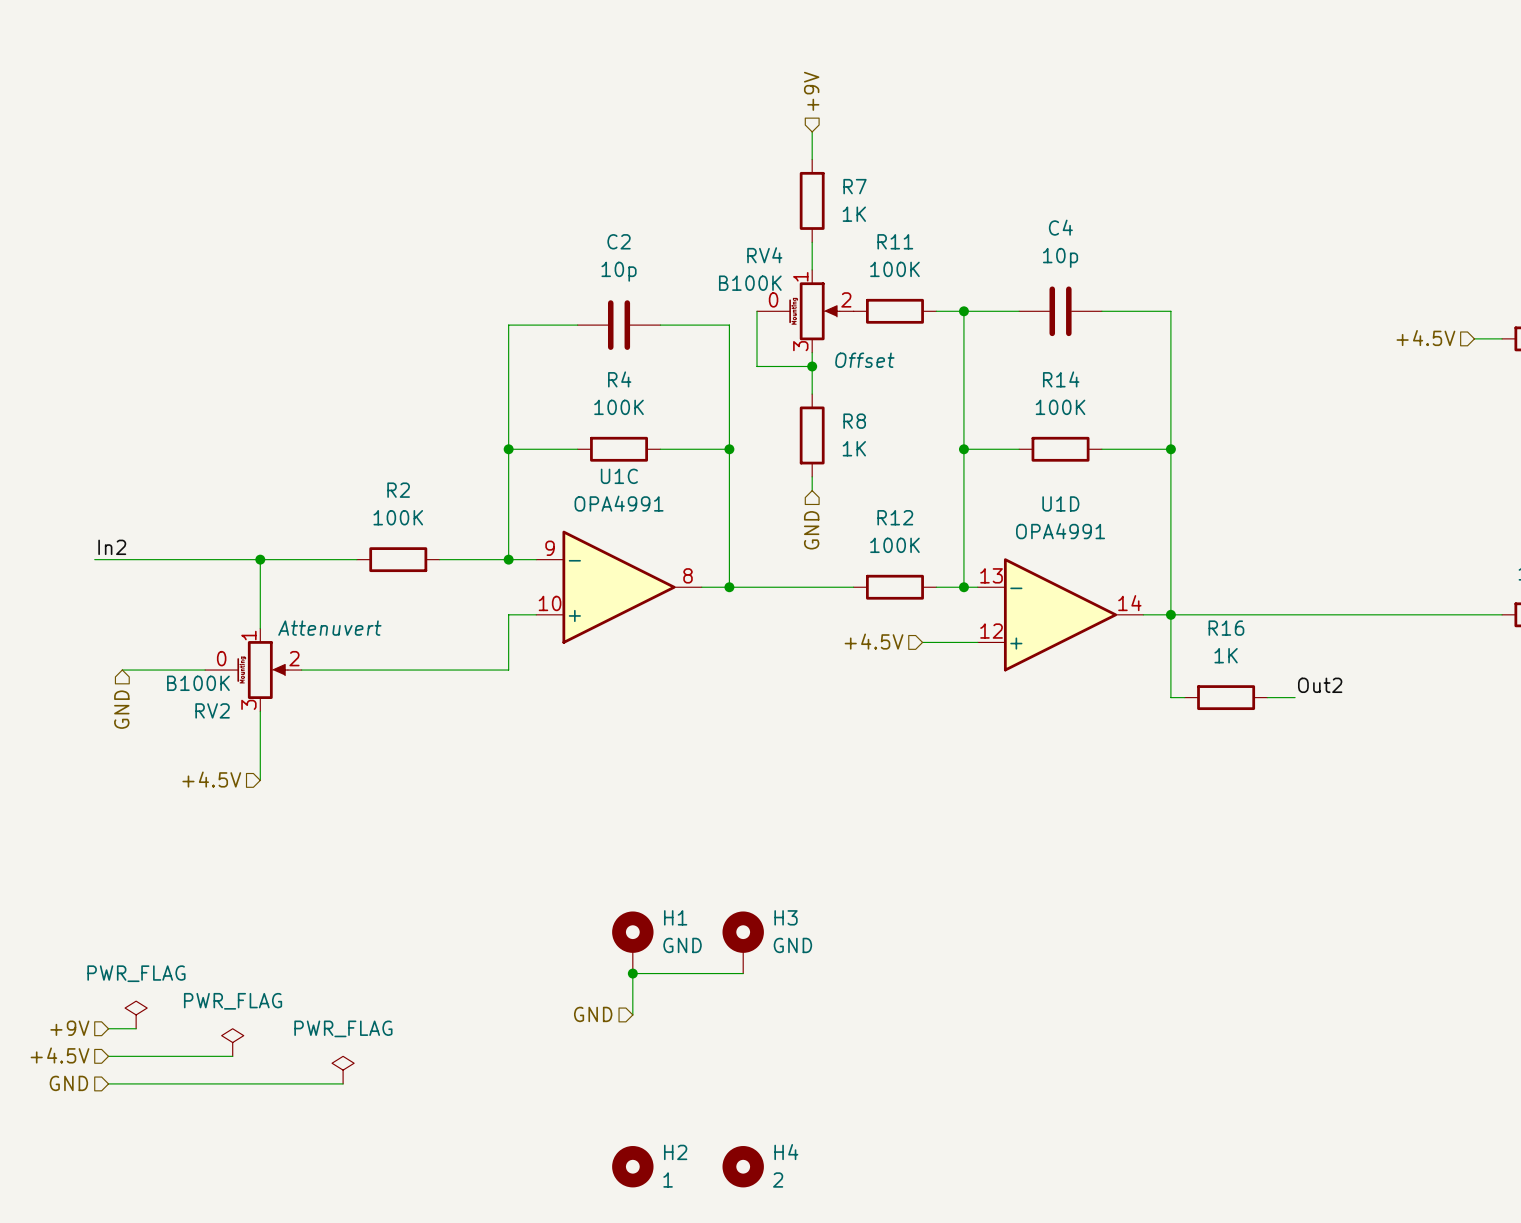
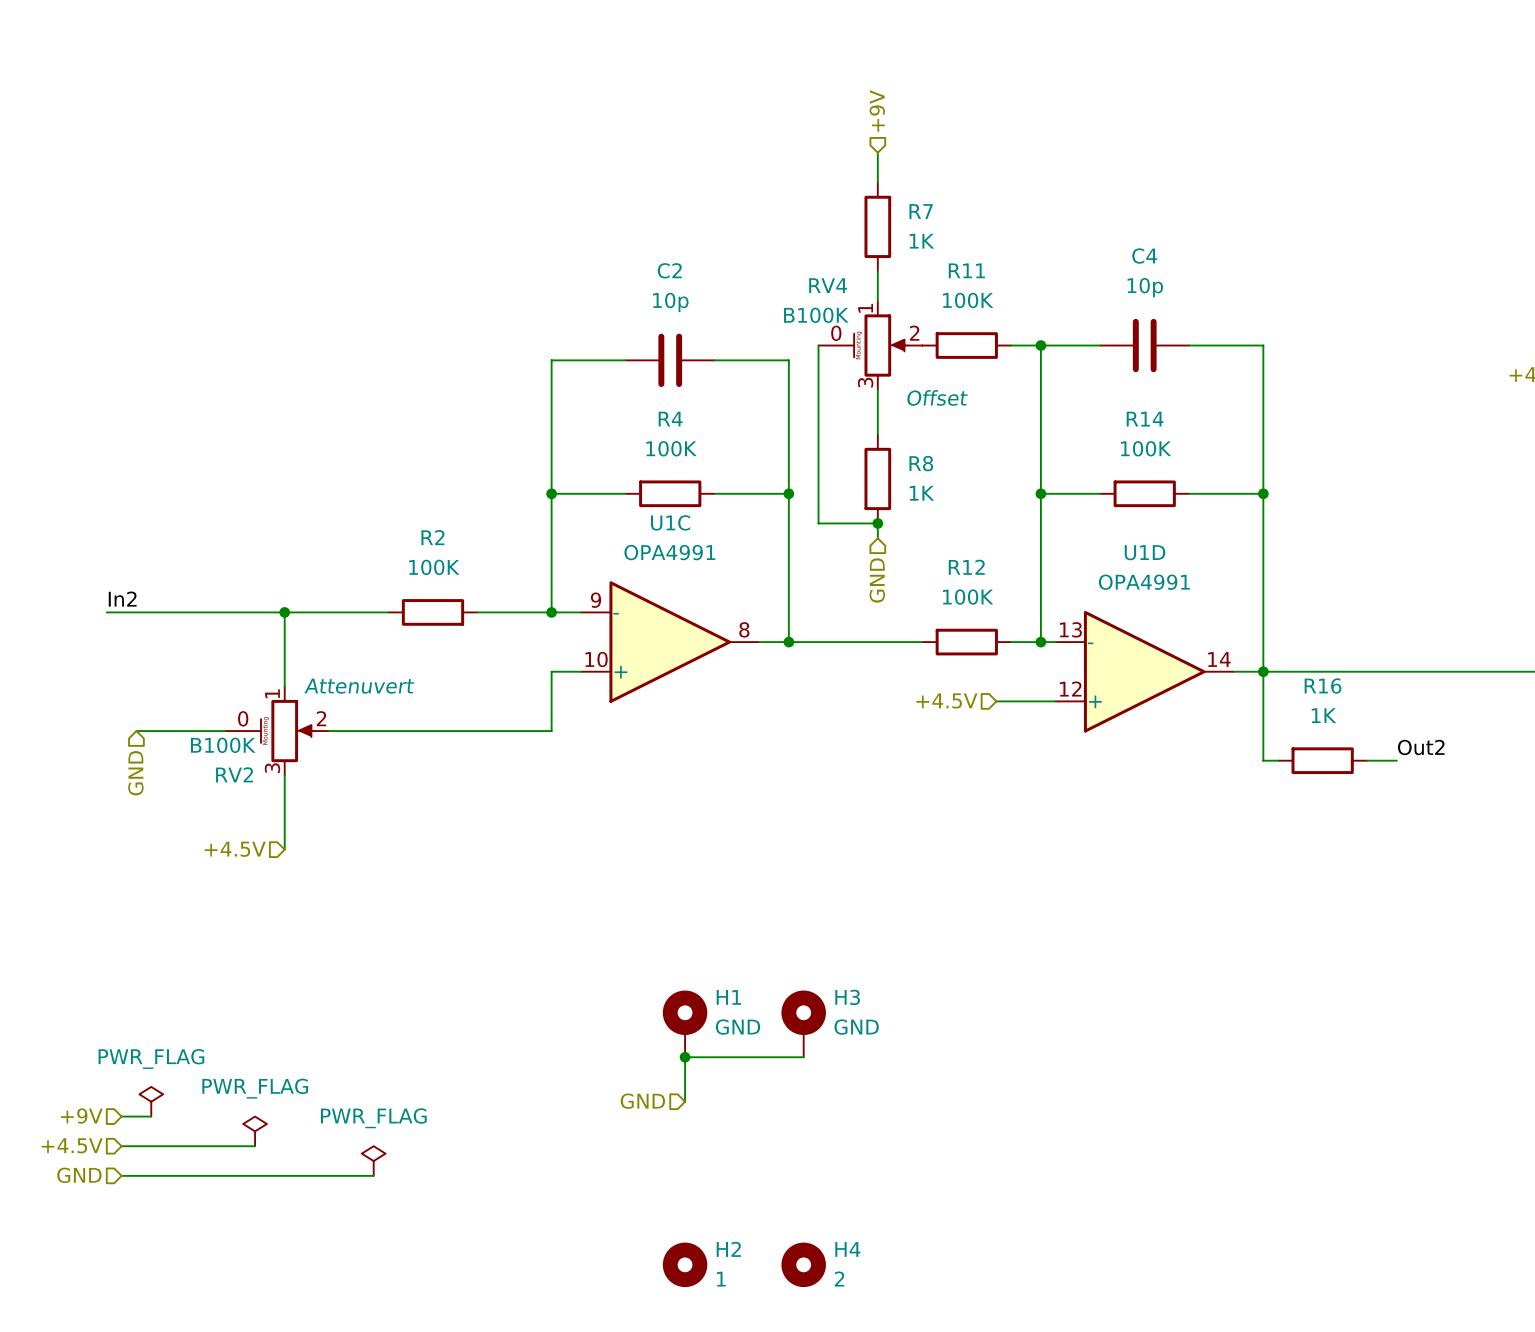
wire: (757, 366) (812, 366) -> (818, 404) (818, 523) (877, 523)
junction: (812, 366) -> none
junction: none -> (877, 523)

